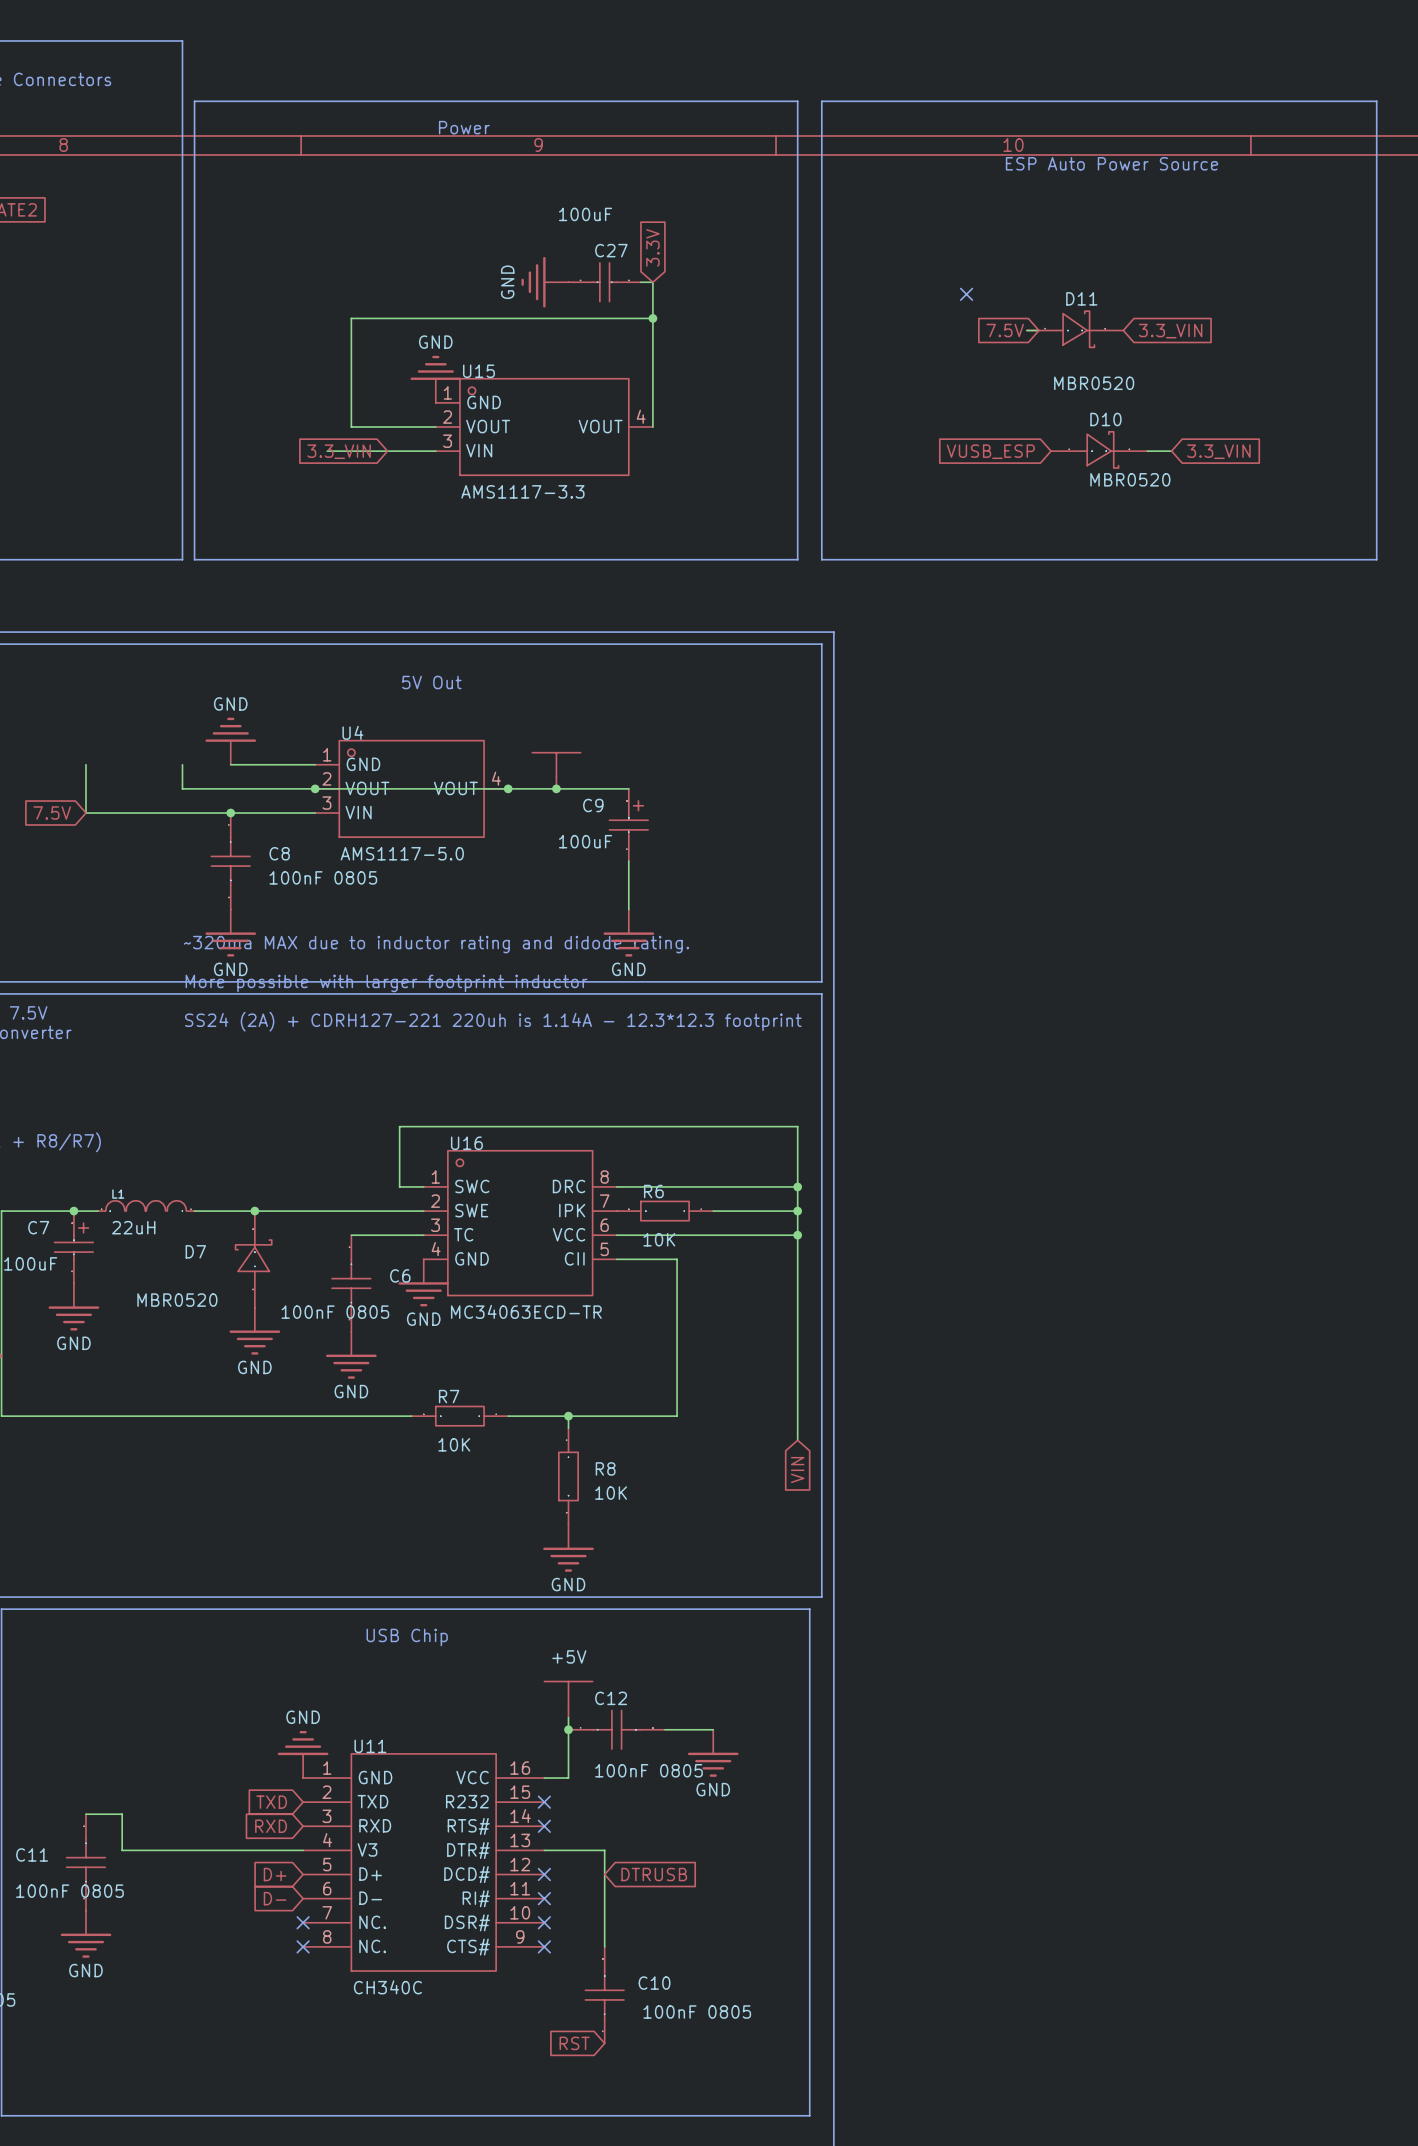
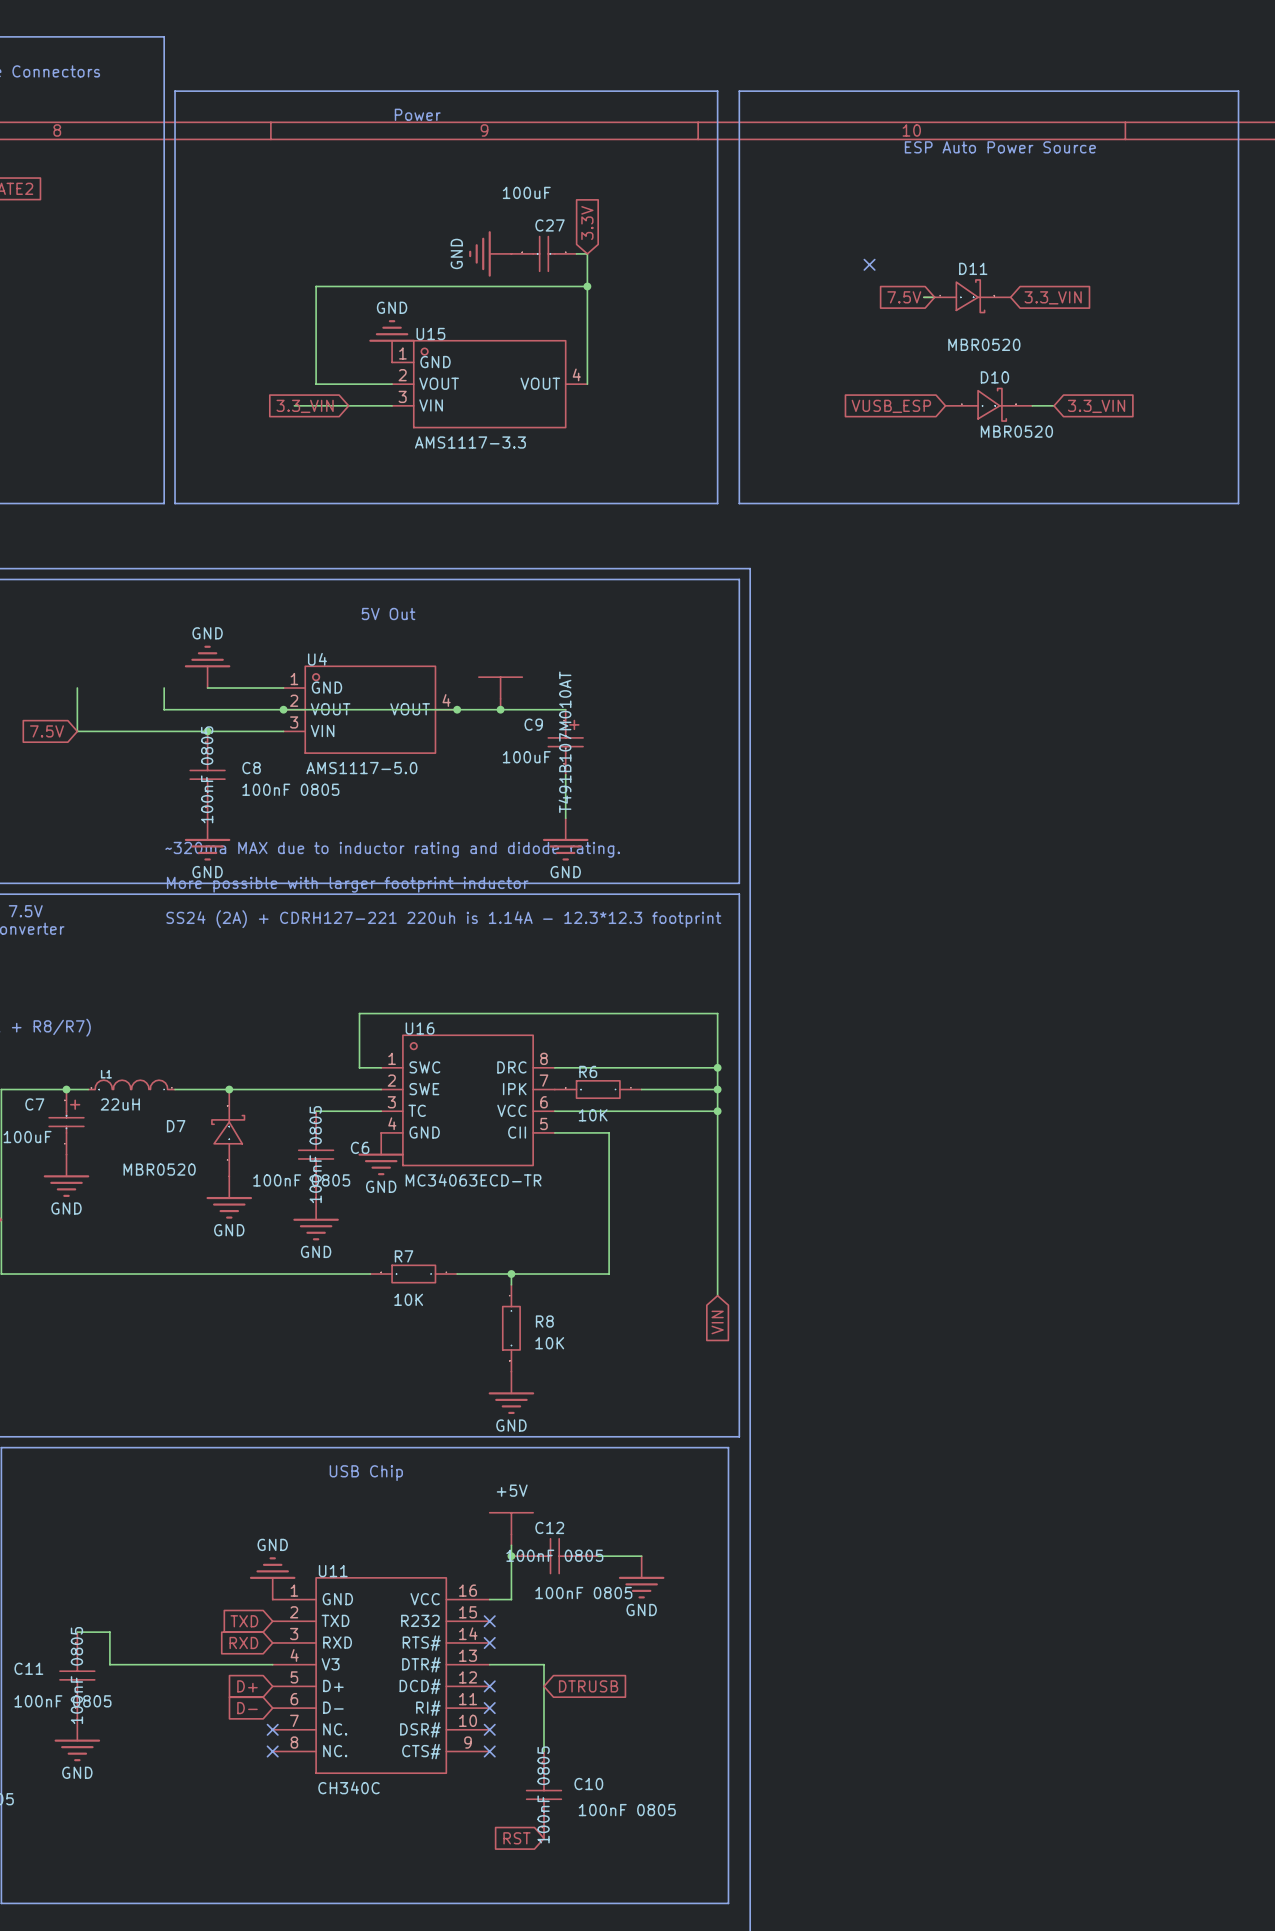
C9 text: none -> T491B107M010AT (565, 742)
C8 text: none -> 100nF 0805 (207, 774)
C6 text: none -> 100nF 0805 (315, 1154)
C12 text: none -> 100nF 0805 (554, 1555)
C11 text: none -> 100nF 0805 (76, 1675)
C10 text: none -> 100nF 0805 (543, 1794)

